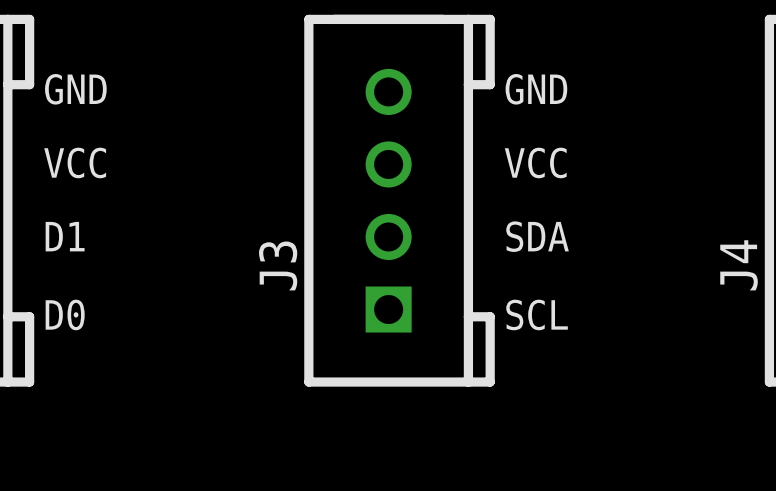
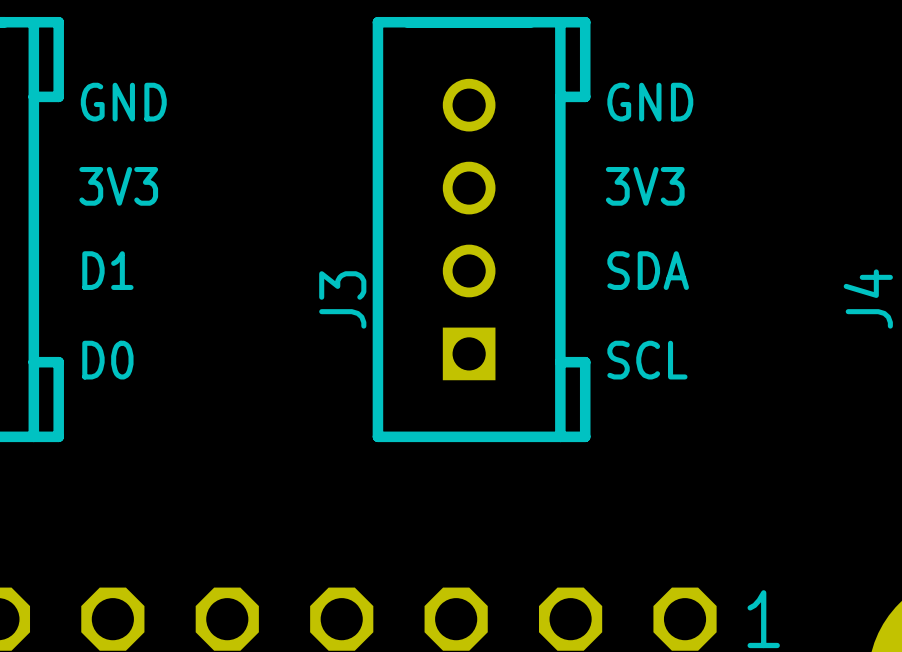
text: VCC (75, 162) -> 3V3 (118, 186)
text: VCC (535, 162) -> 3V3 (645, 186)

